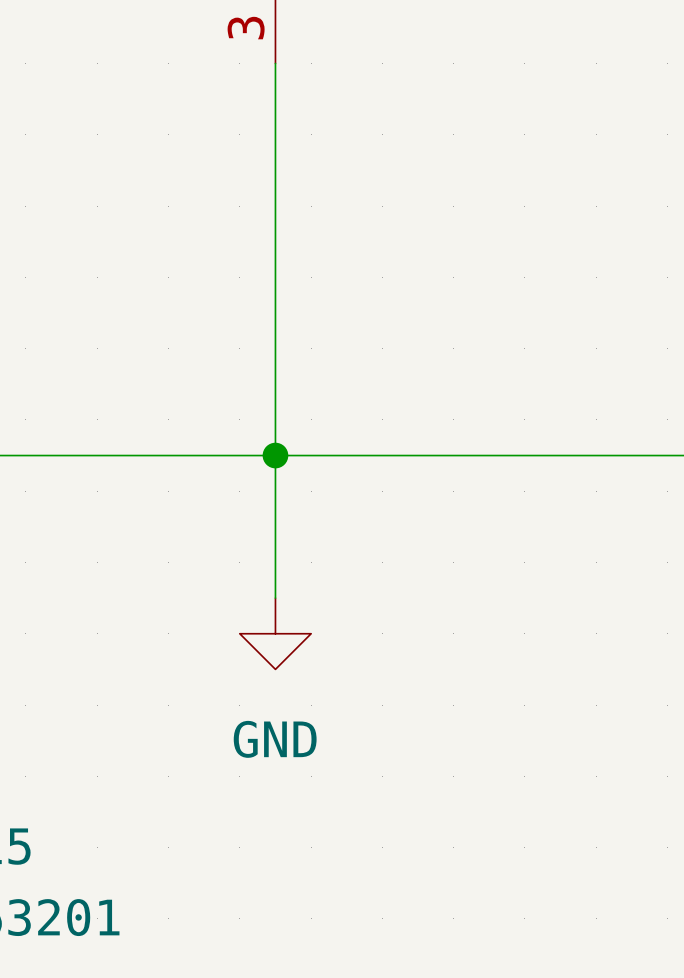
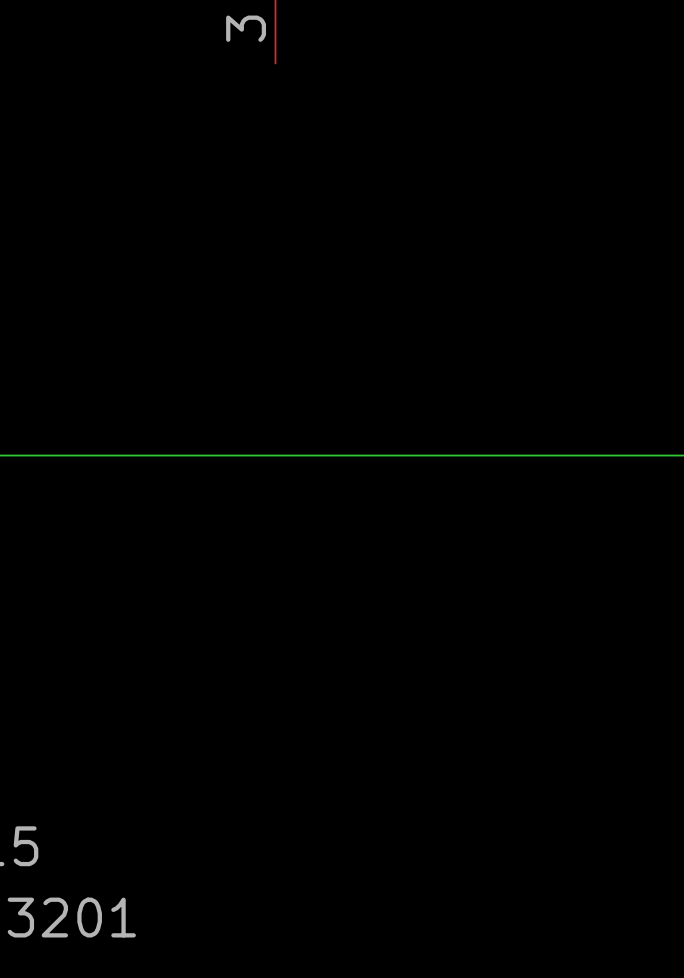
wire: (275, 63) (275, 598) -> none
junction: (275, 455) -> none
power symbol: GND (275, 633) -> none

